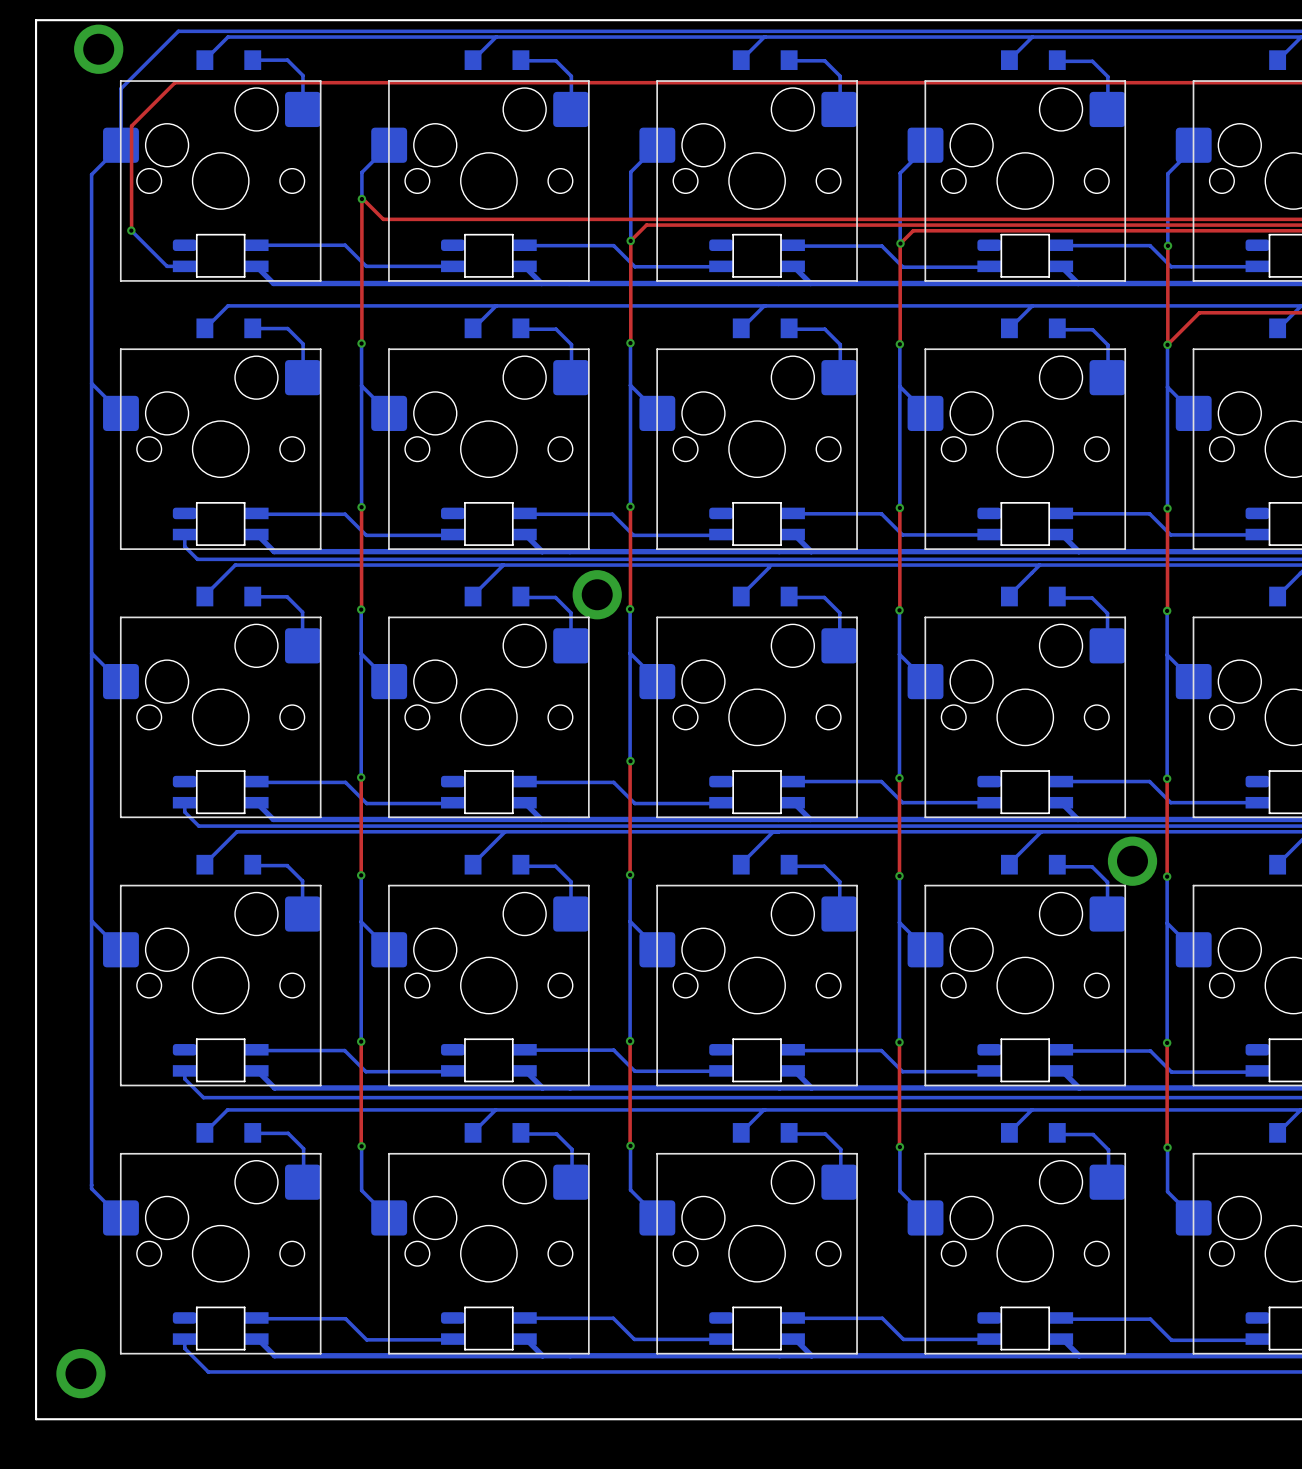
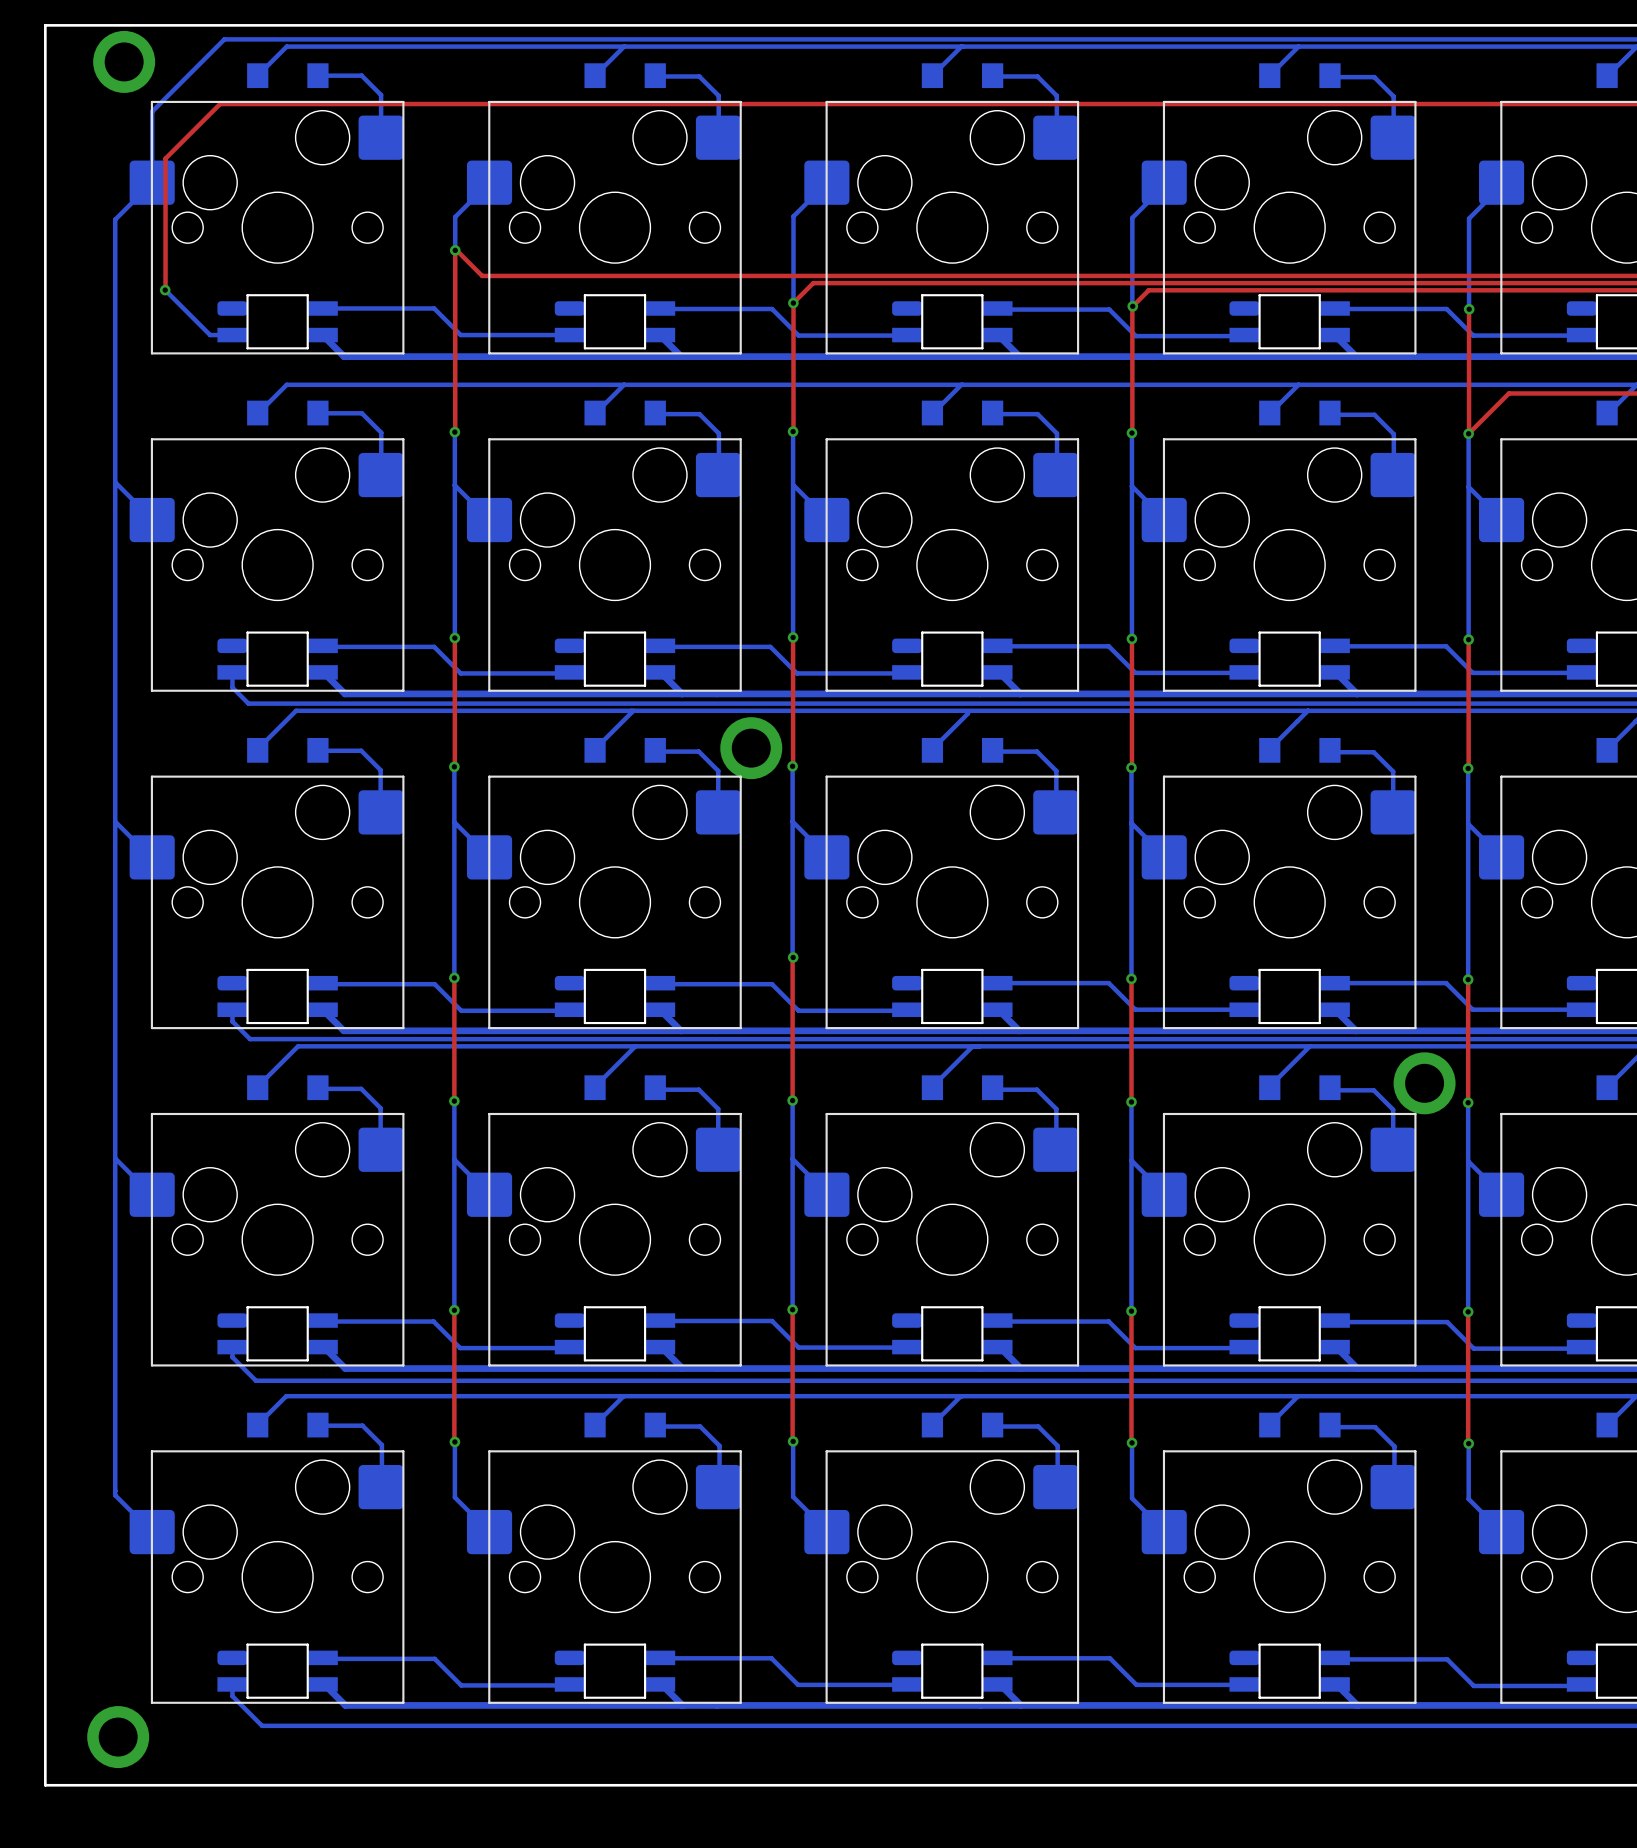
part position: (80, 1373) -> (118, 1737)

